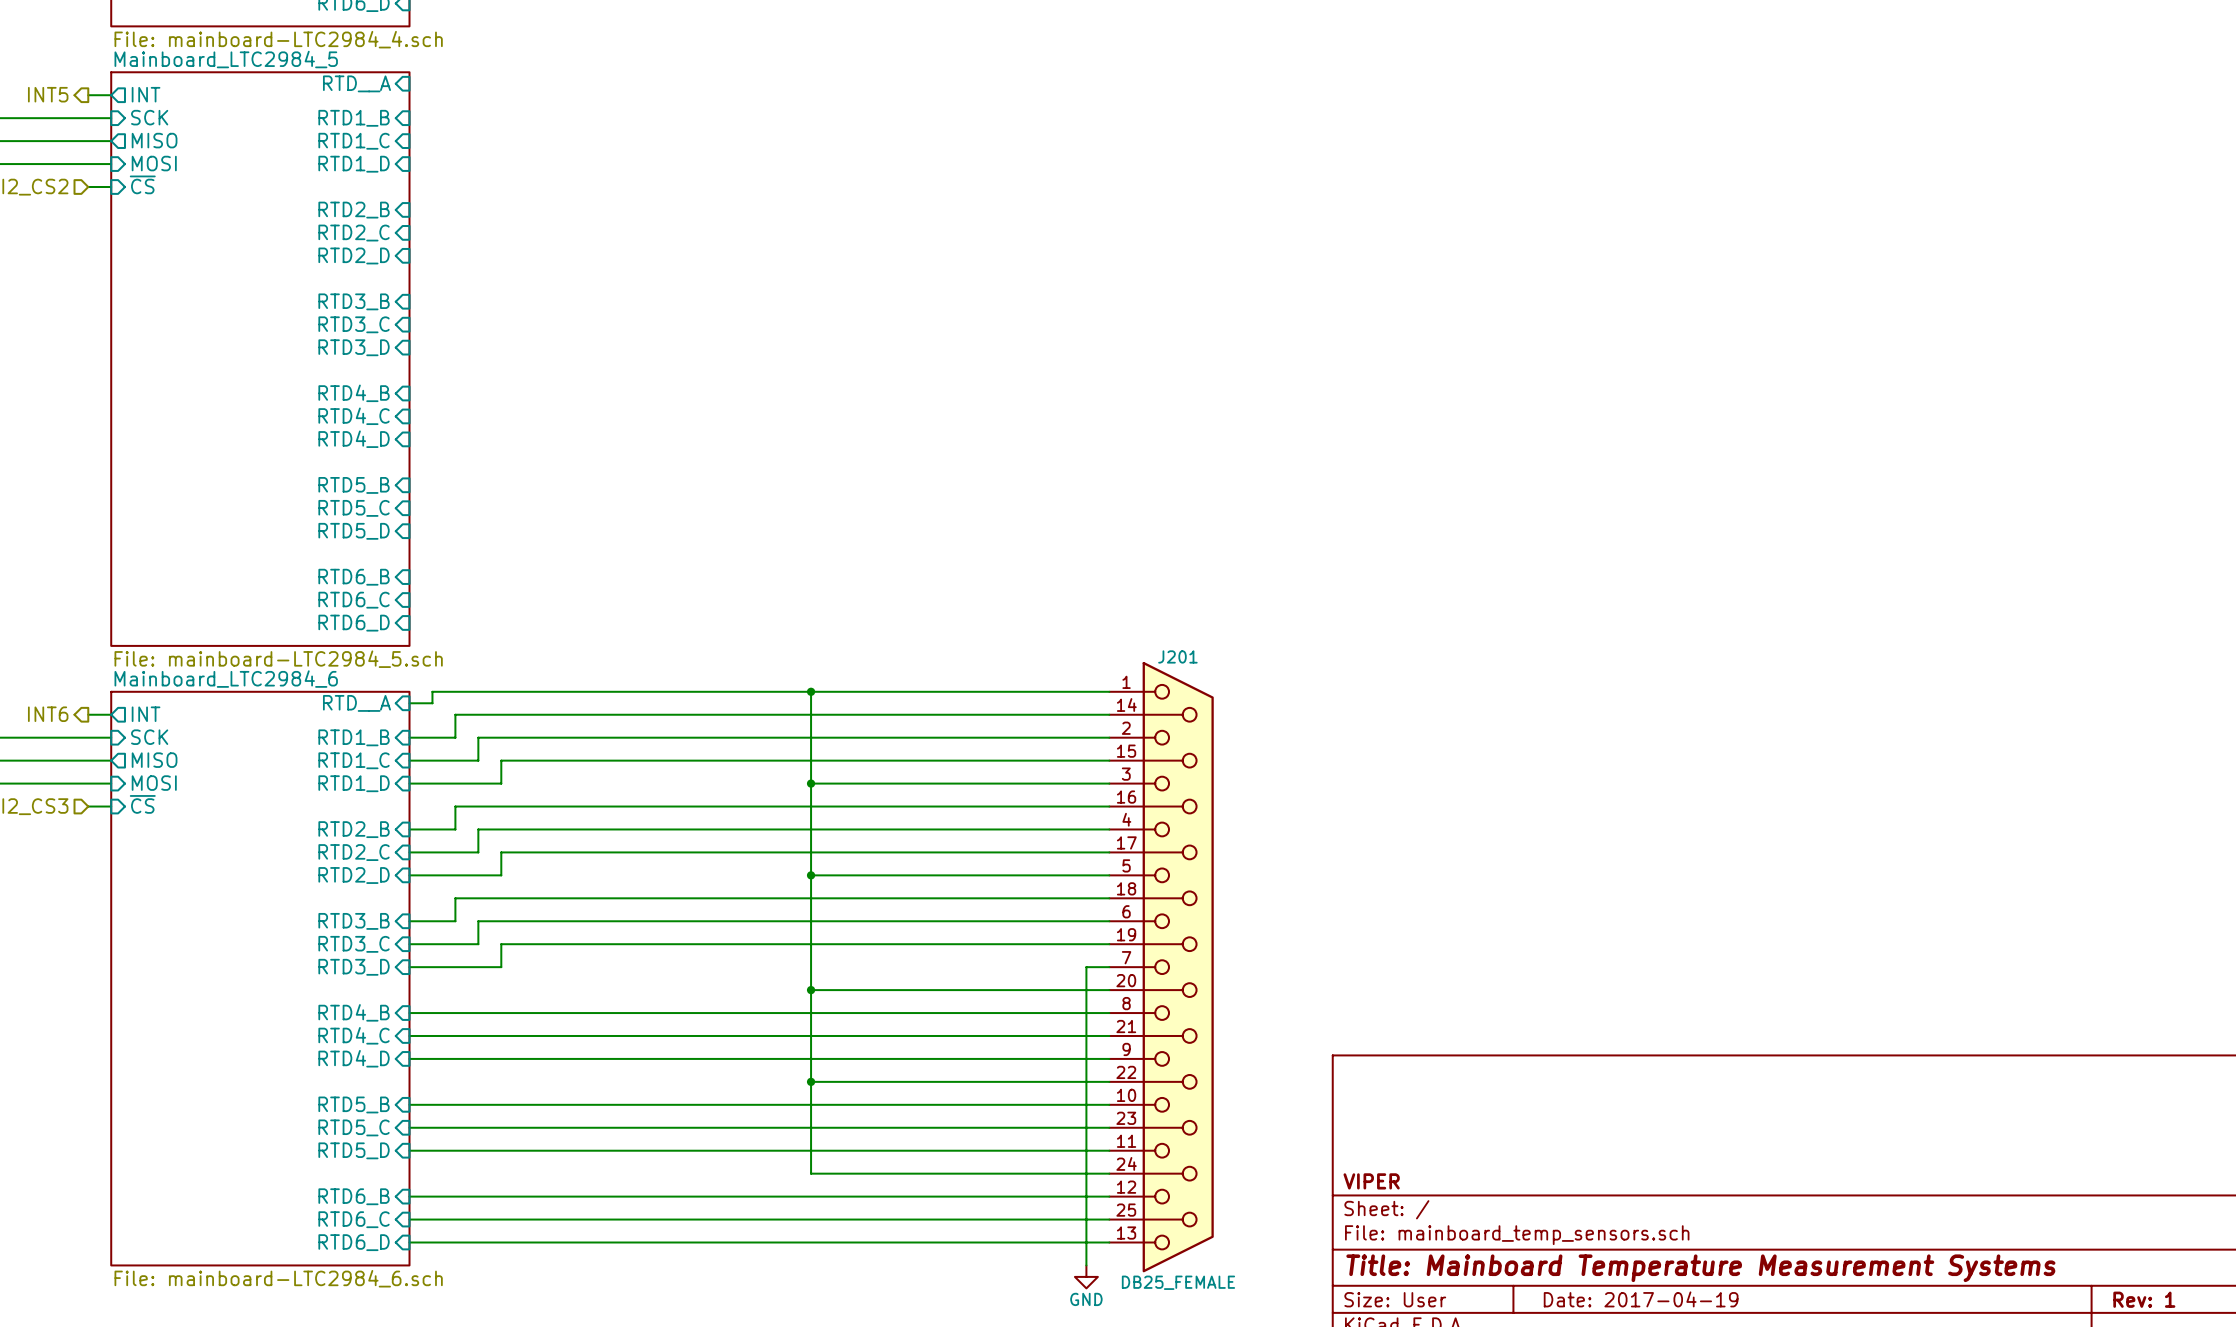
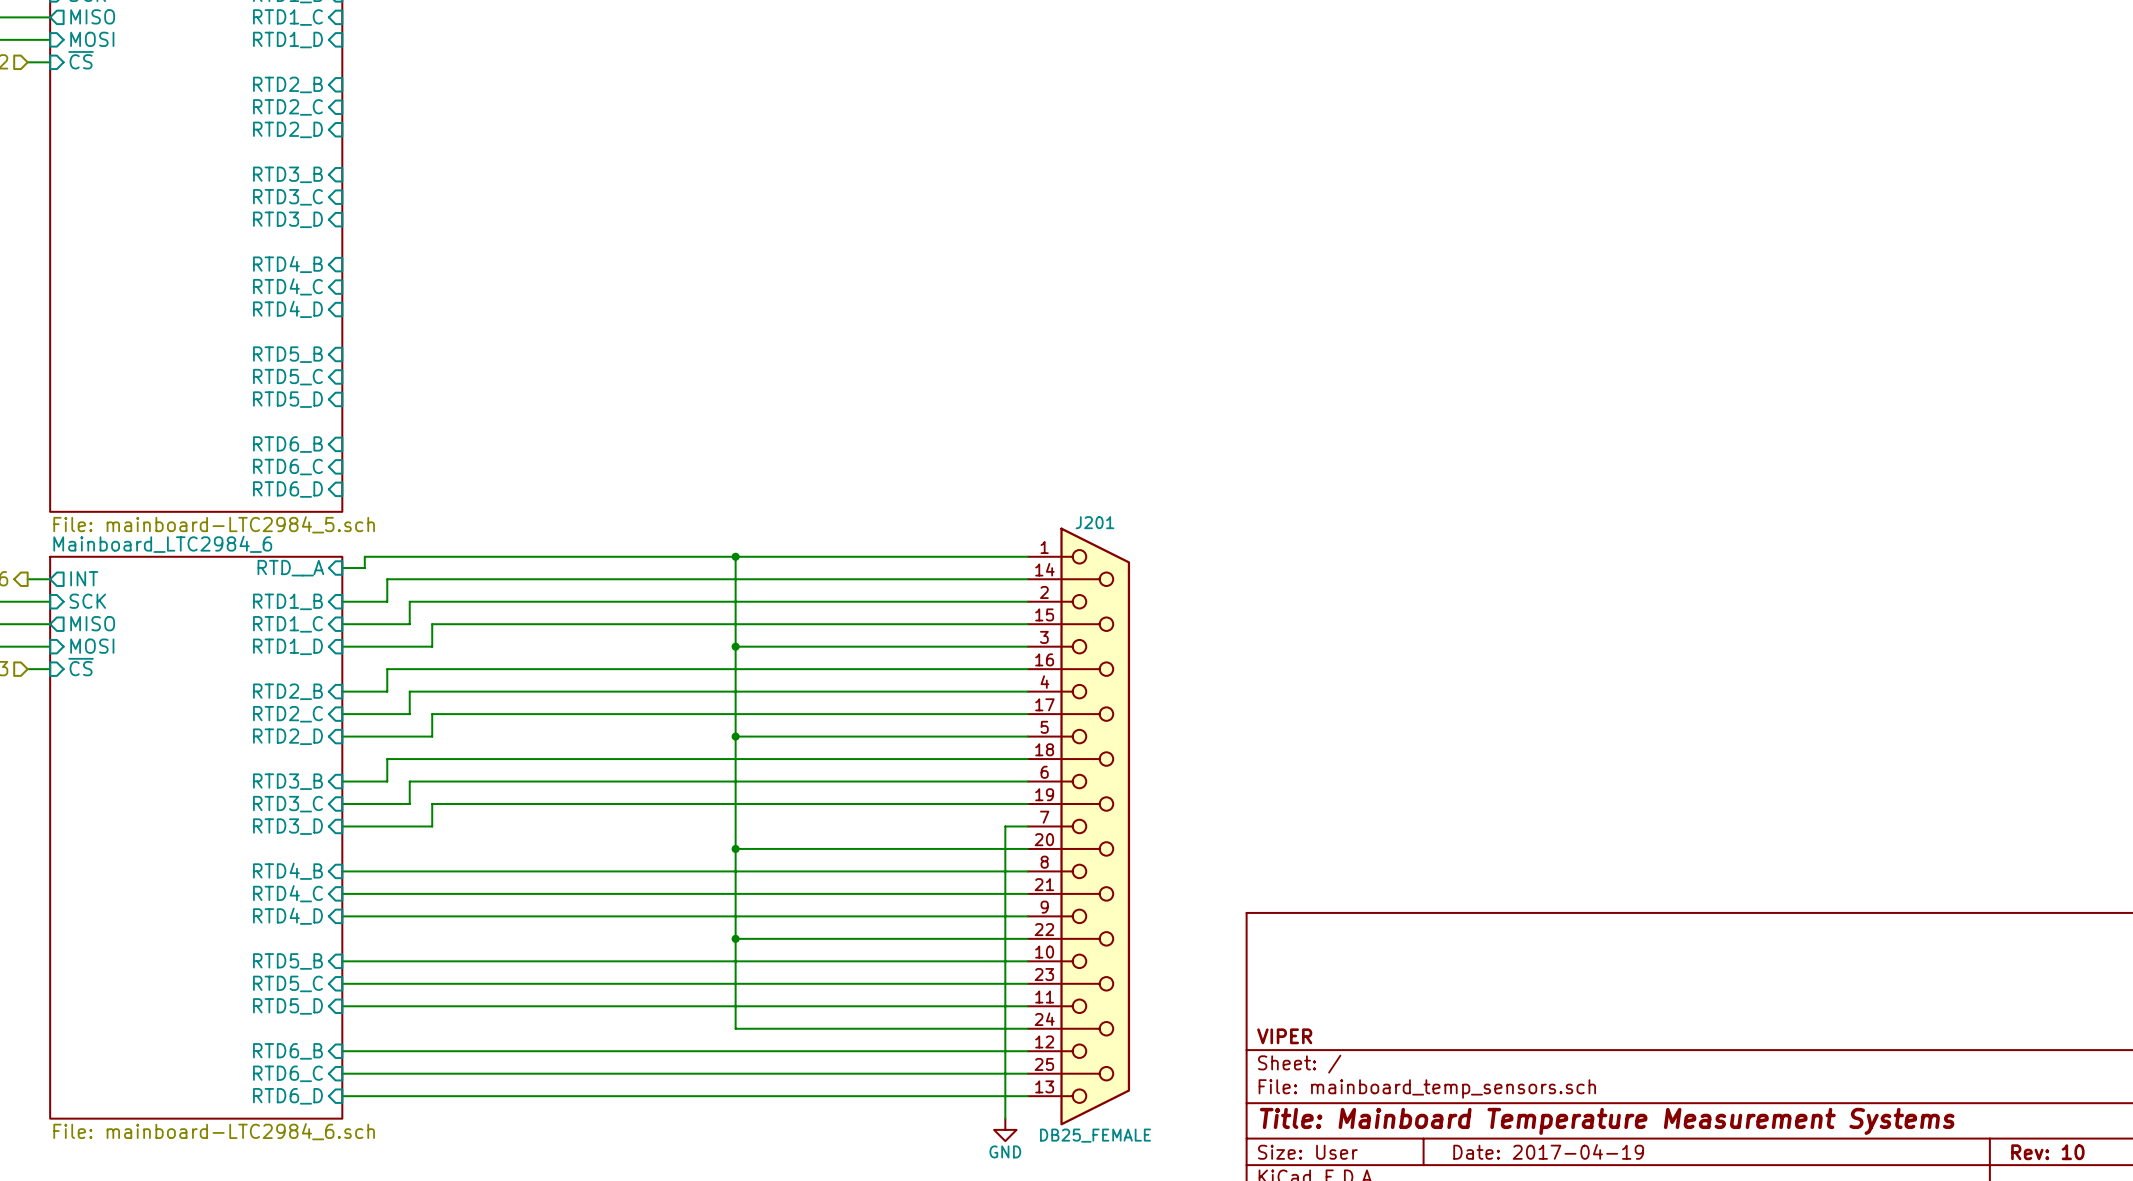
title block: Rev: 1 (2144, 1299) -> Rev: 10 (2047, 1152)

